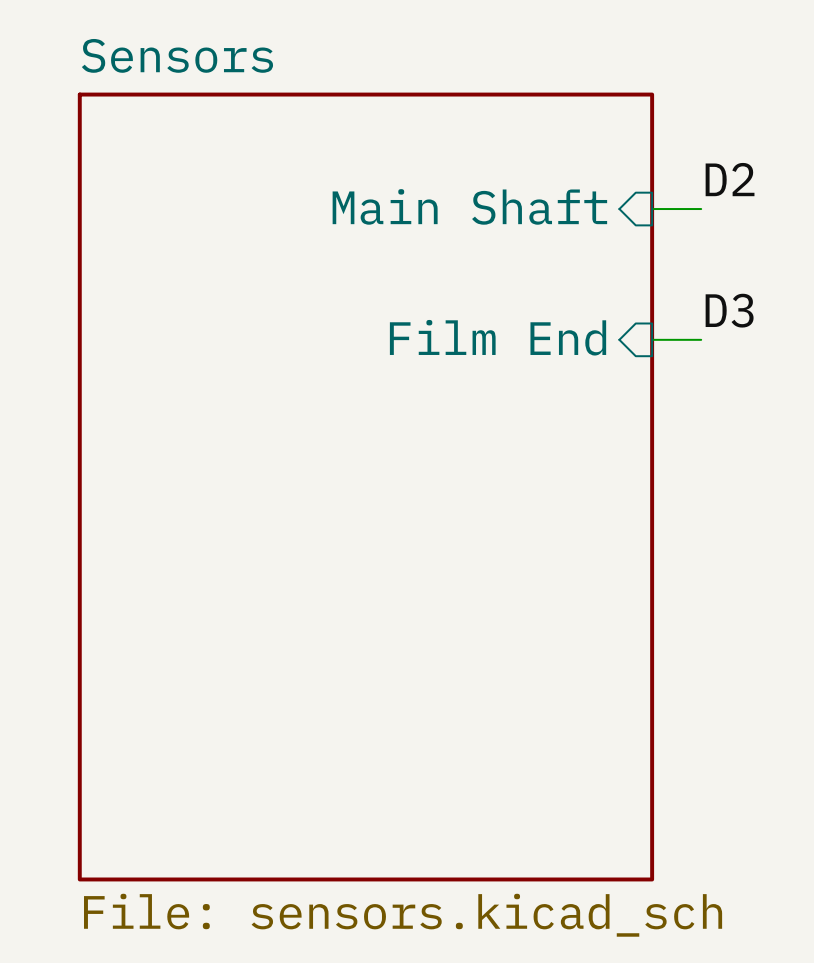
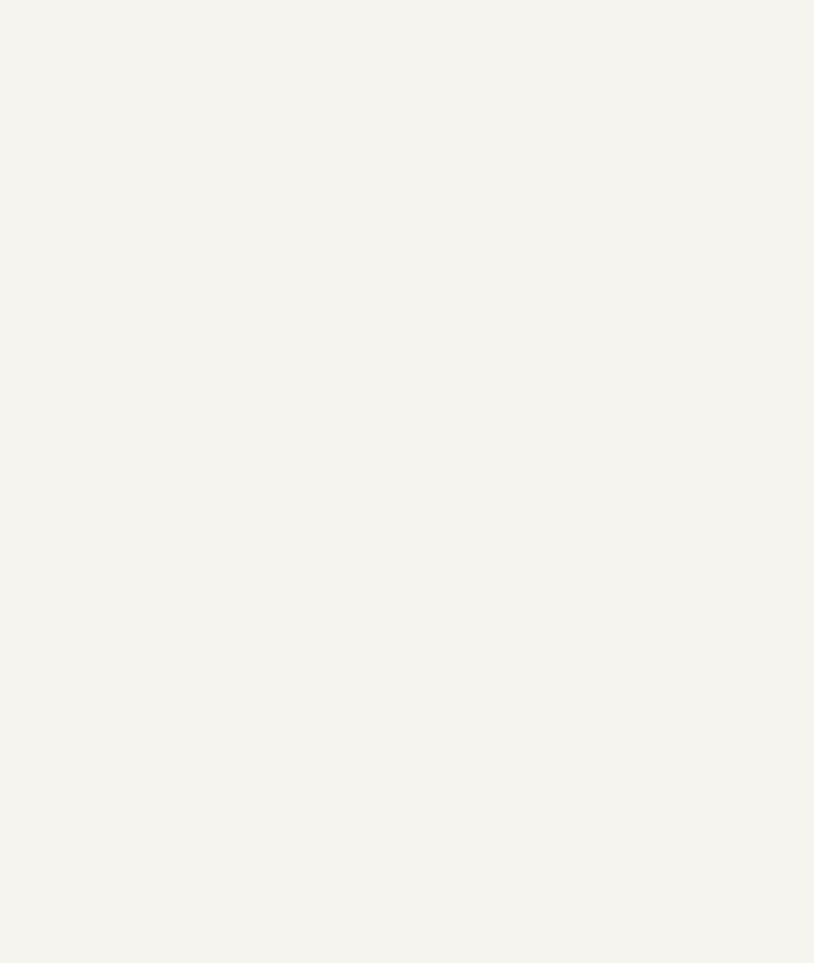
label: D2 (730, 179) -> none
sheet pin: Main Shaft (469, 206) -> none
wire: (652, 209) (701, 209) -> none
label: D3 (729, 310) -> none
sheet pin: Film End (498, 337) -> none
wire: (652, 339) (701, 339) -> none
sheet Sensors: File: sensors.kicad_sch (365, 487) -> none

